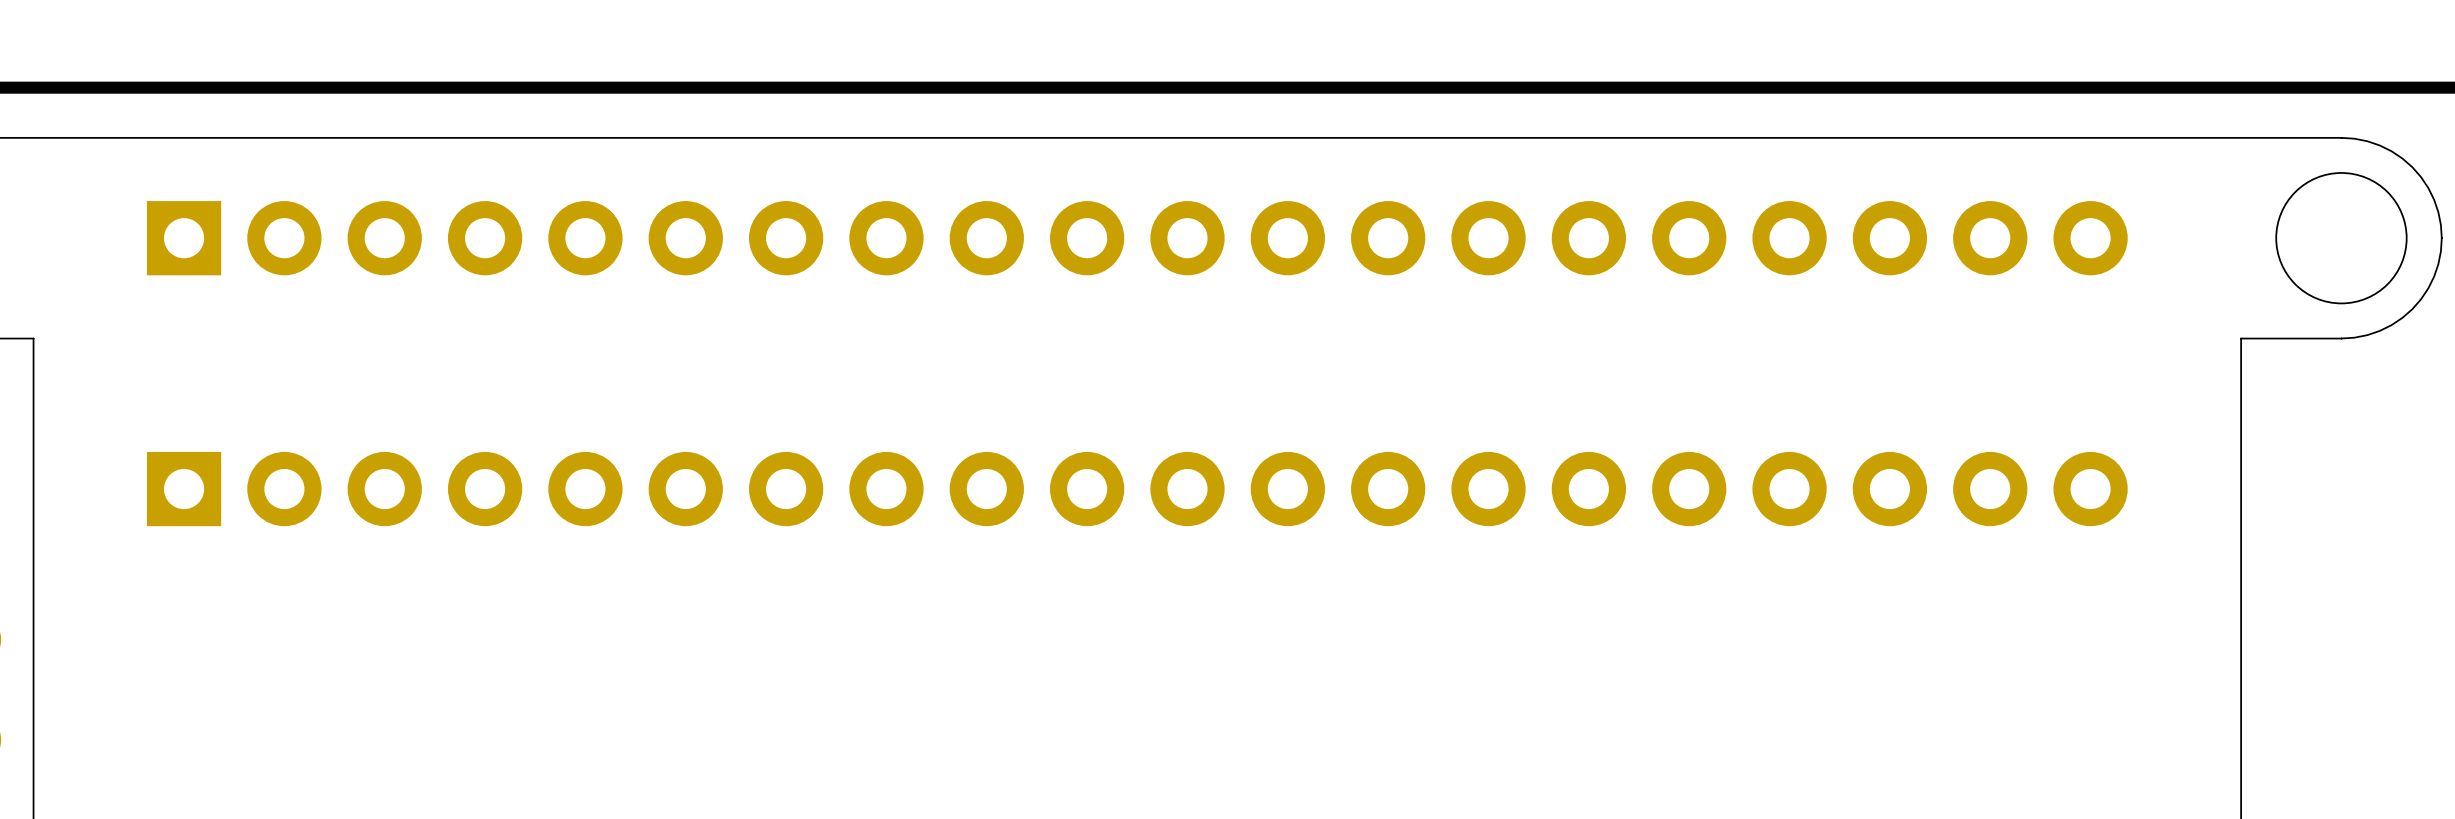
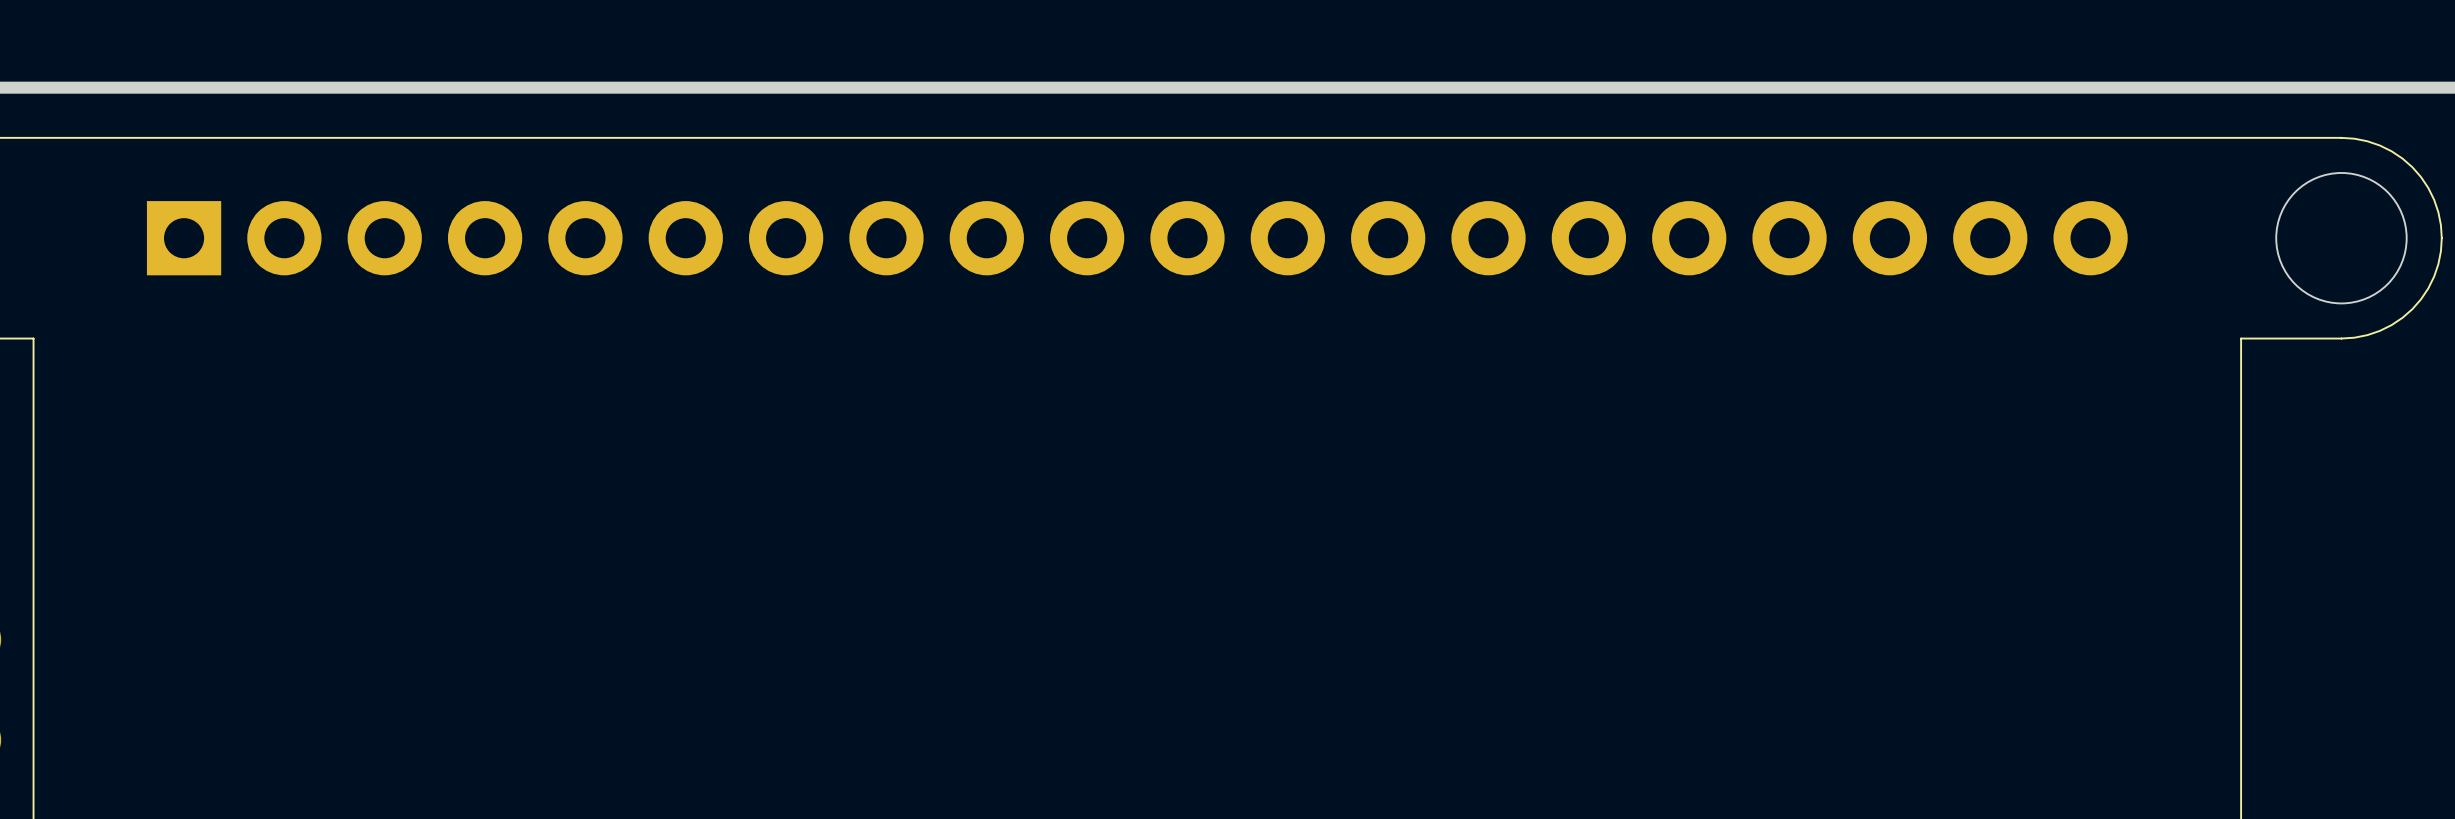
part: (1137, 489) -> none

